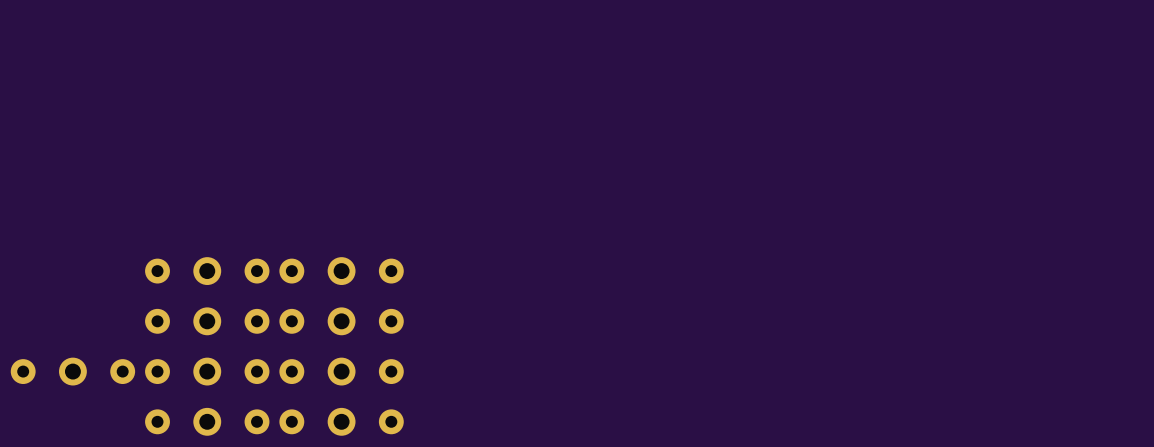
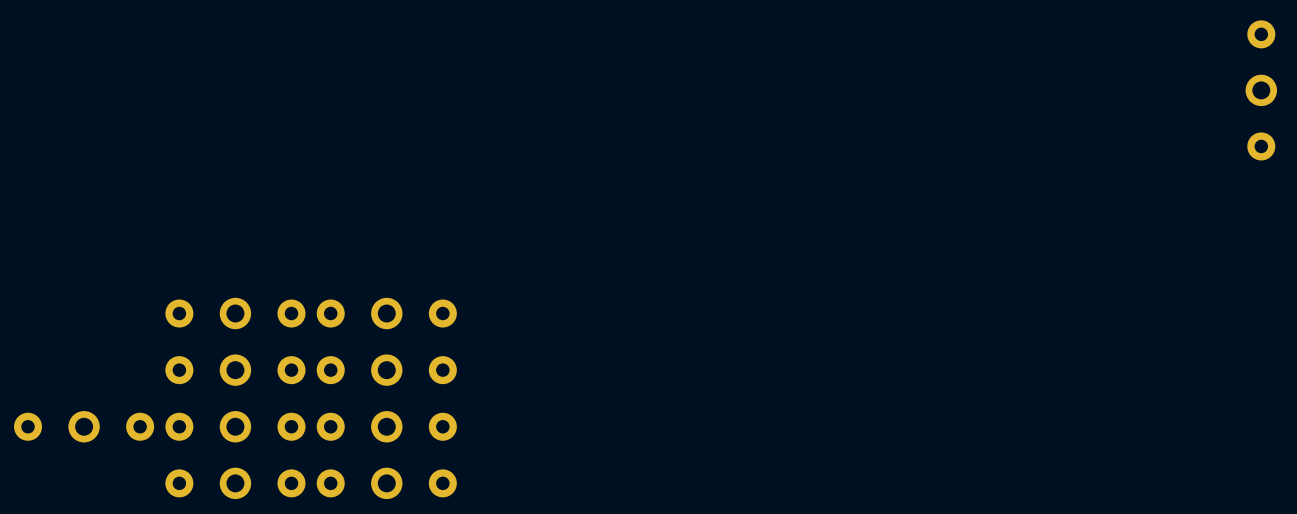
part: none -> (1261, 90)

